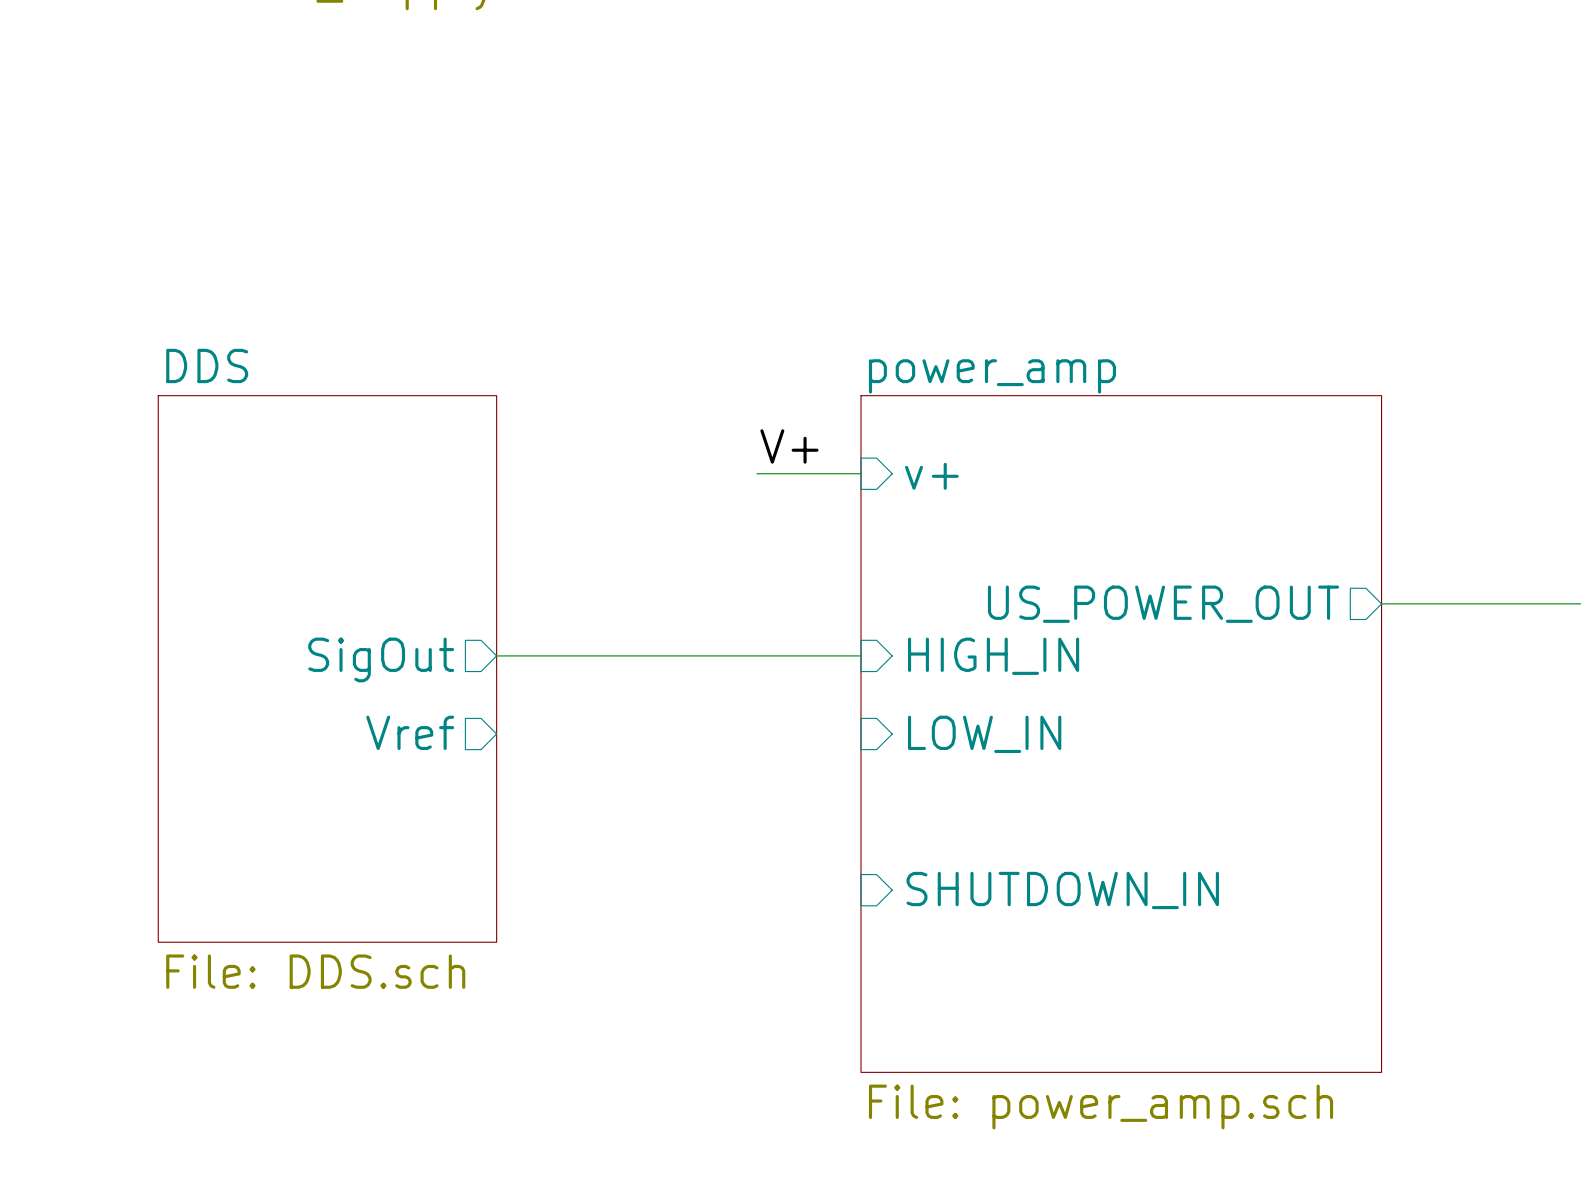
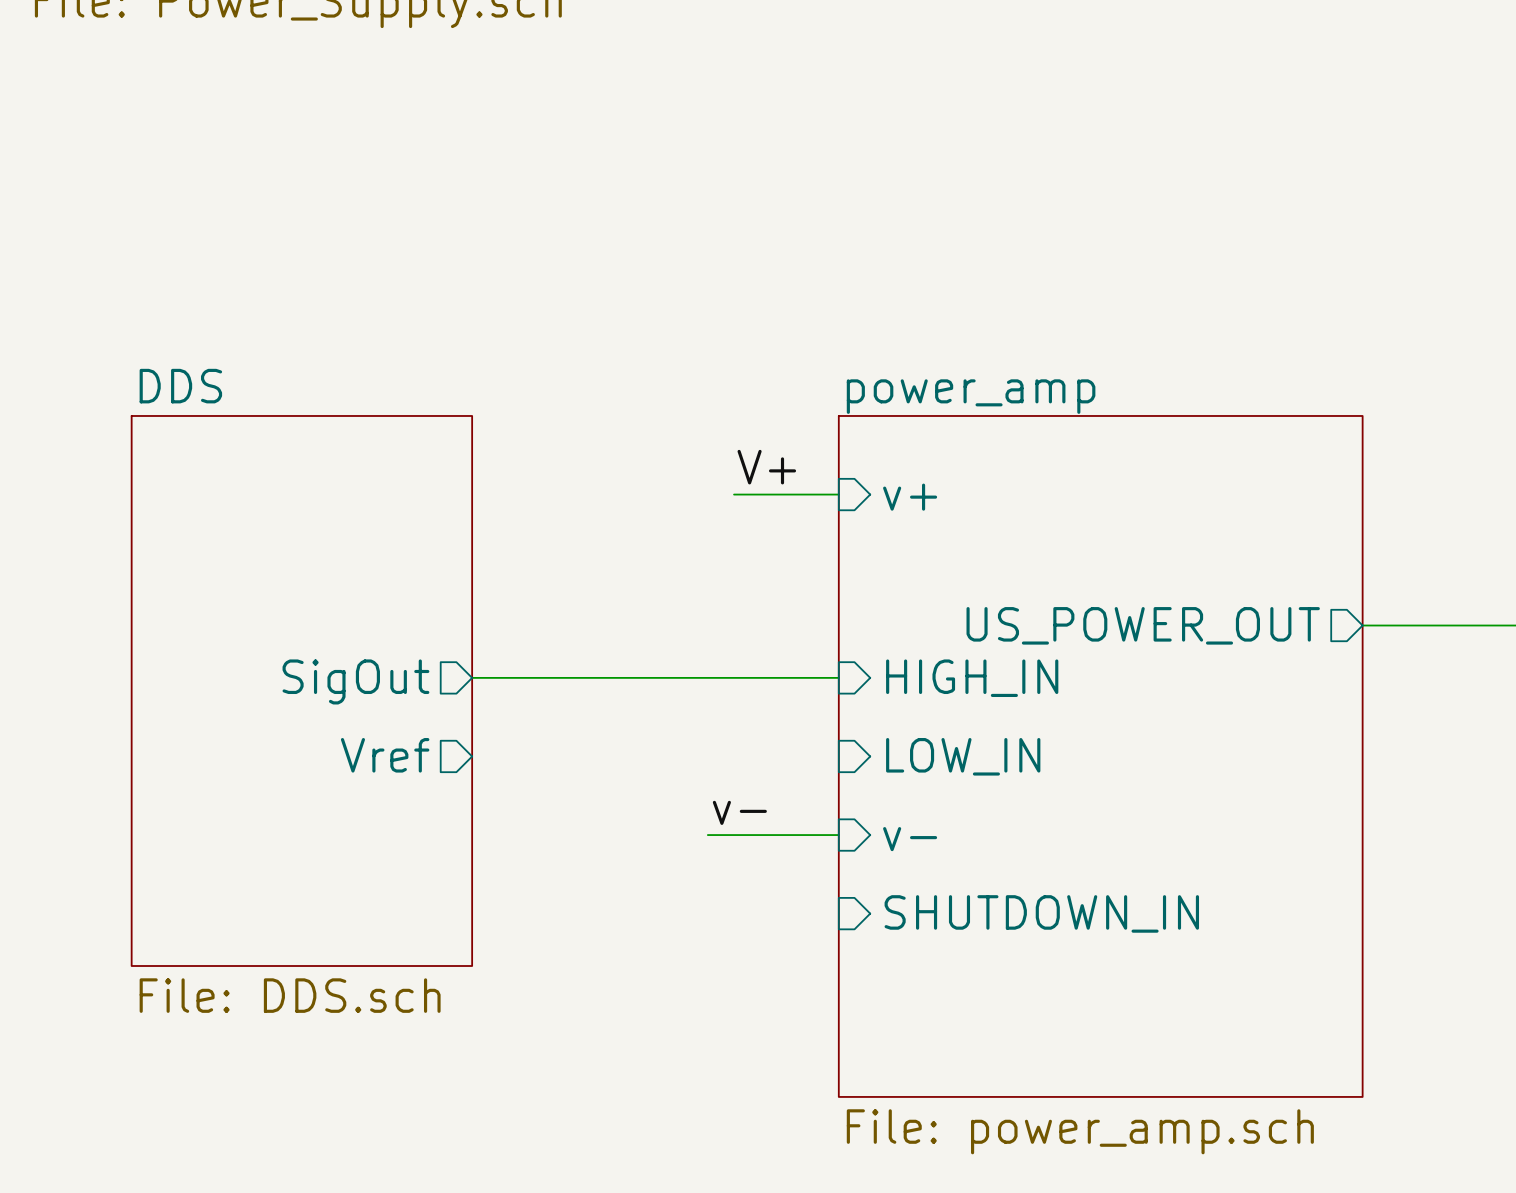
label: none -> v- (739, 812)
wire: none -> (707, 835) (838, 835)
sheet pin: none -> v- (910, 839)

